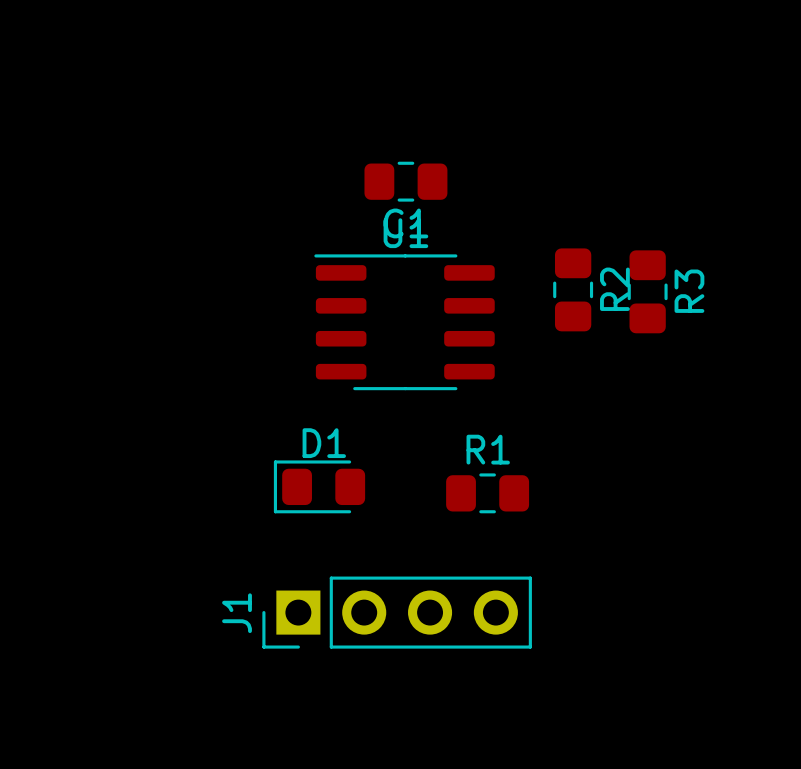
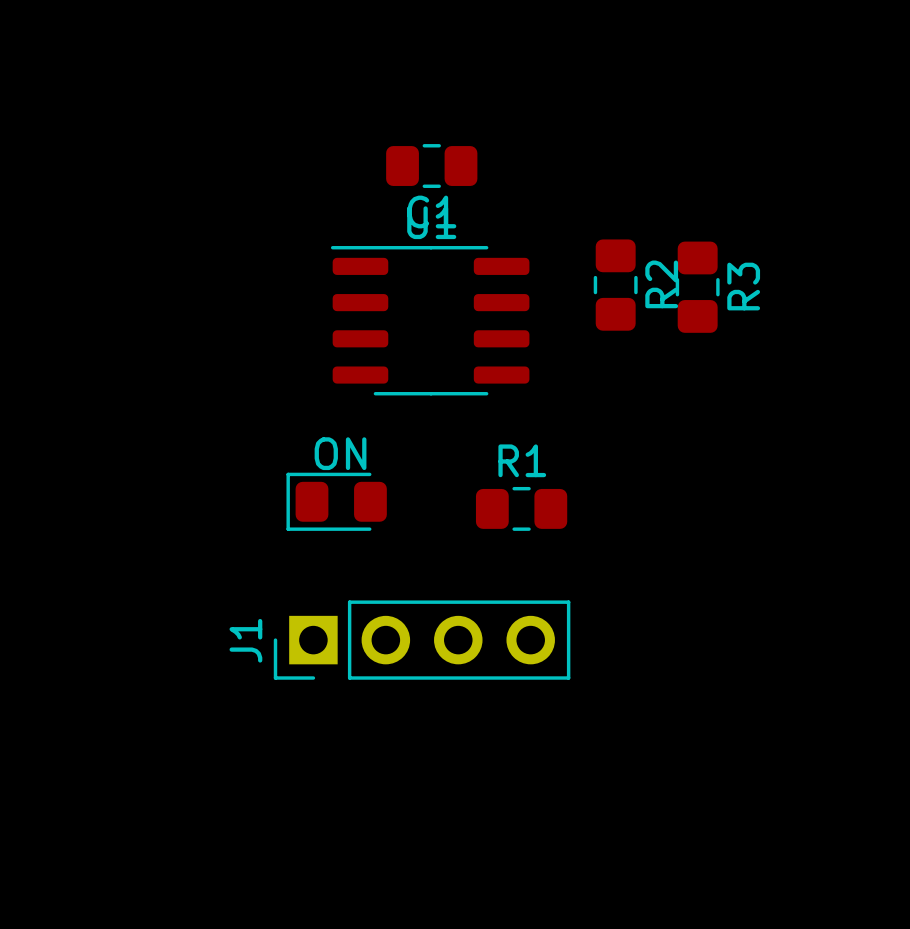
D1 name: D1 (324, 443) -> ON (340, 453)

